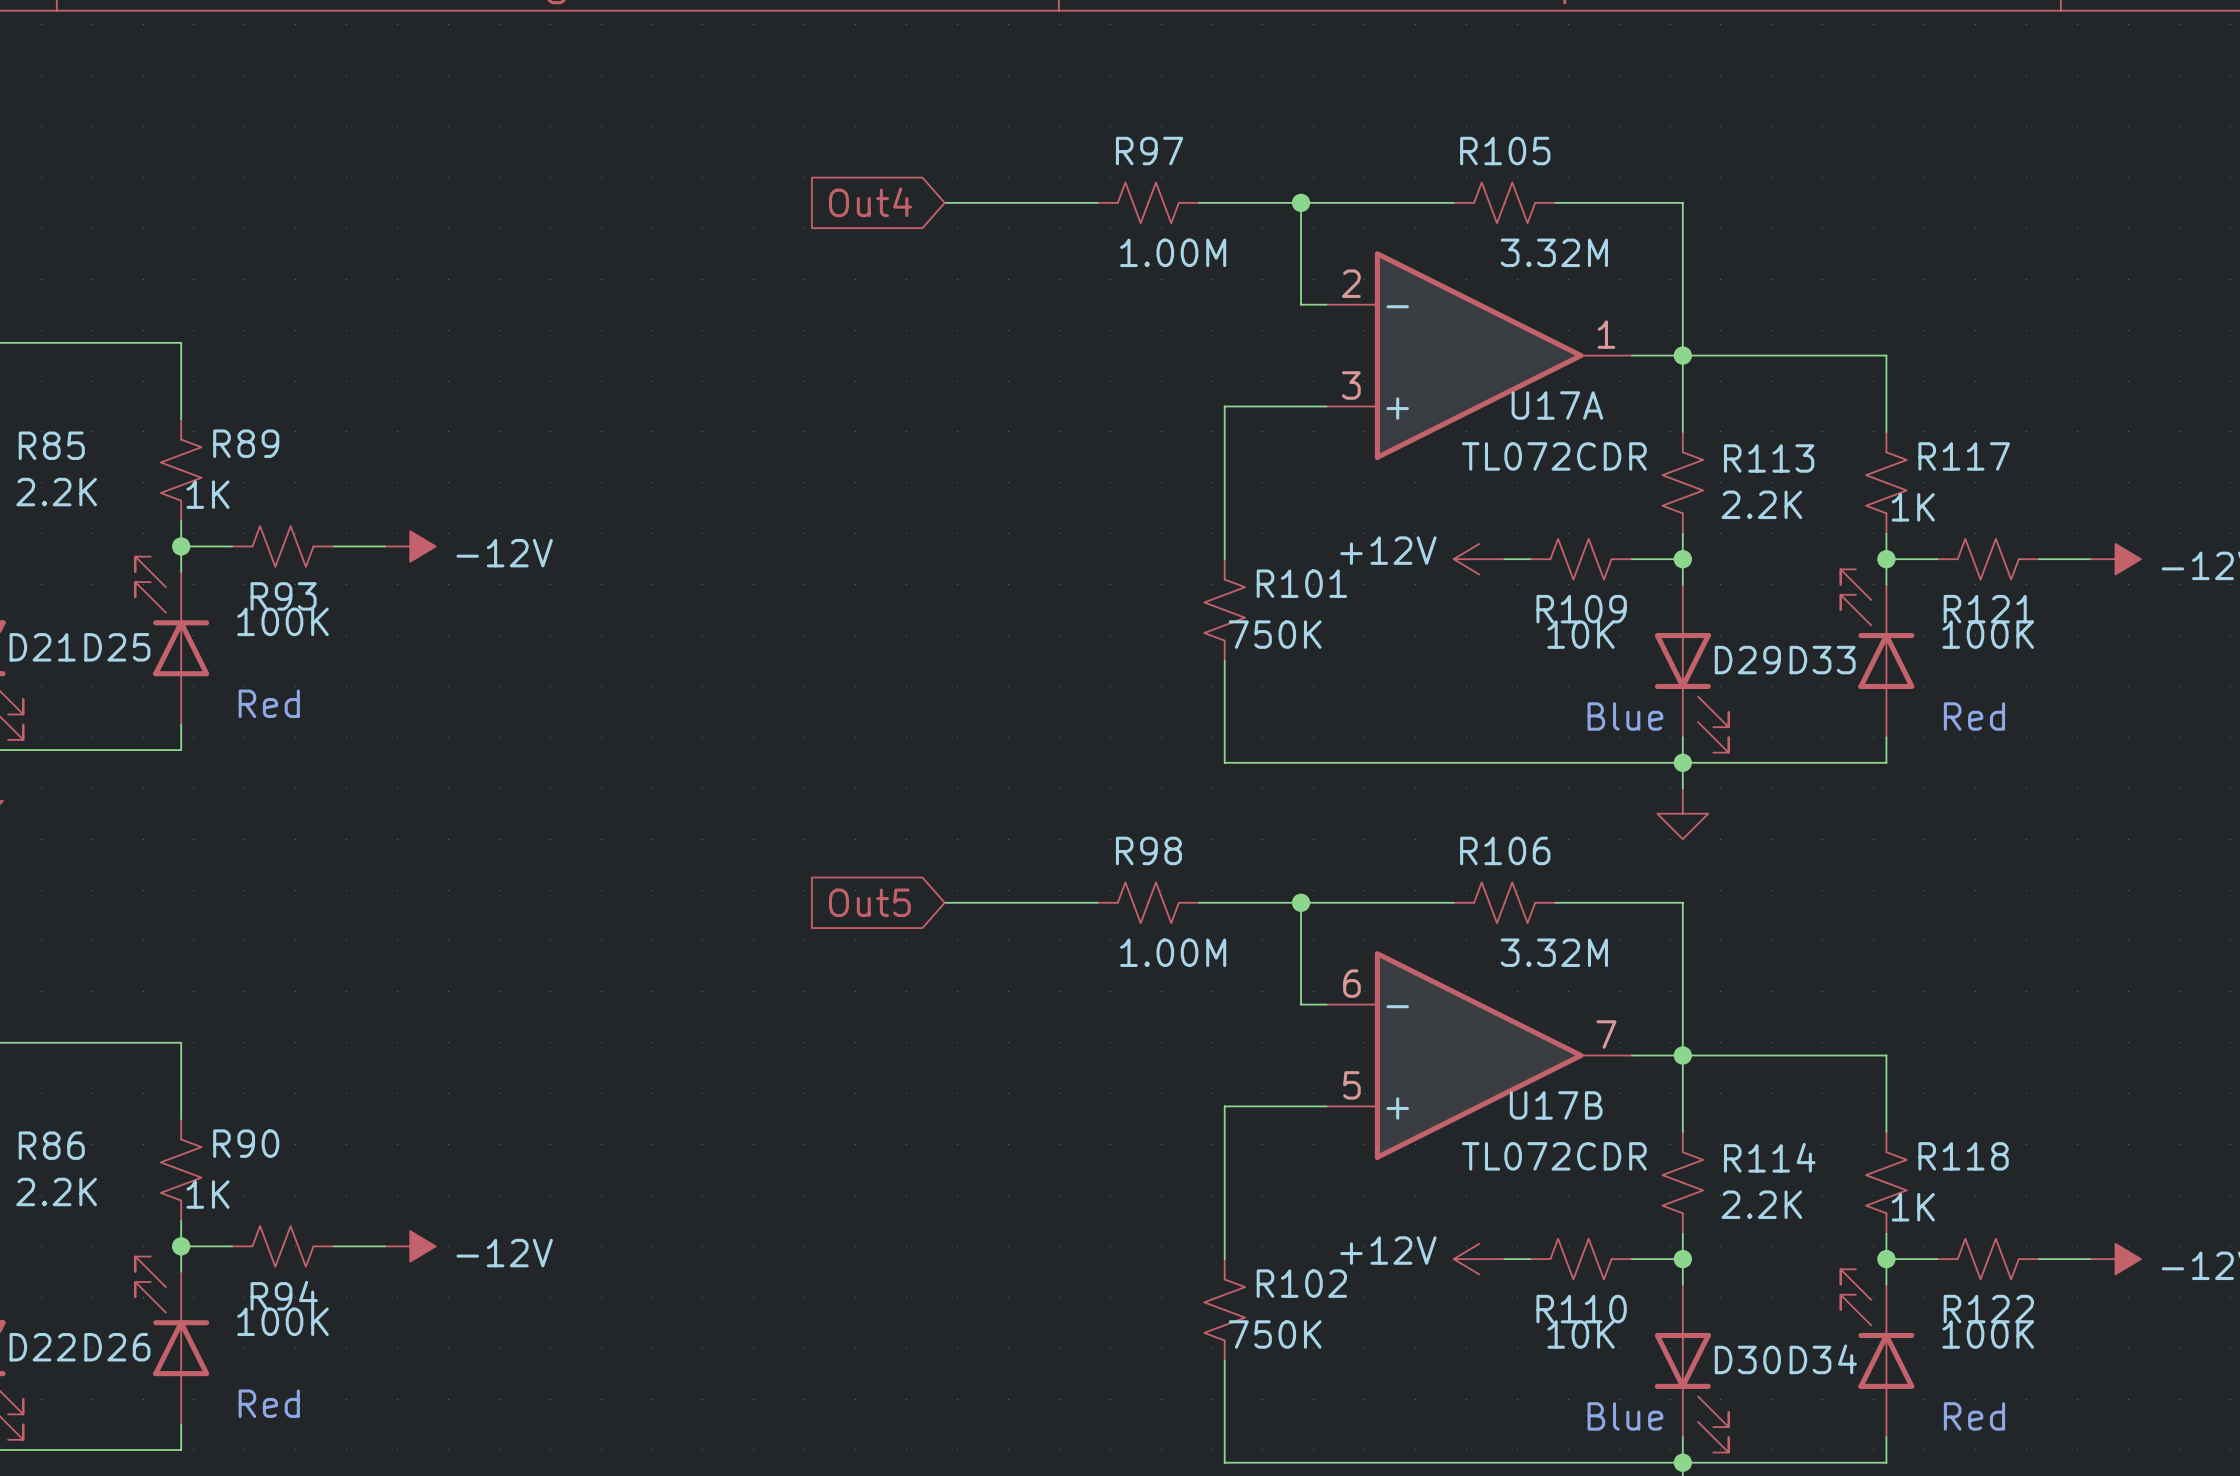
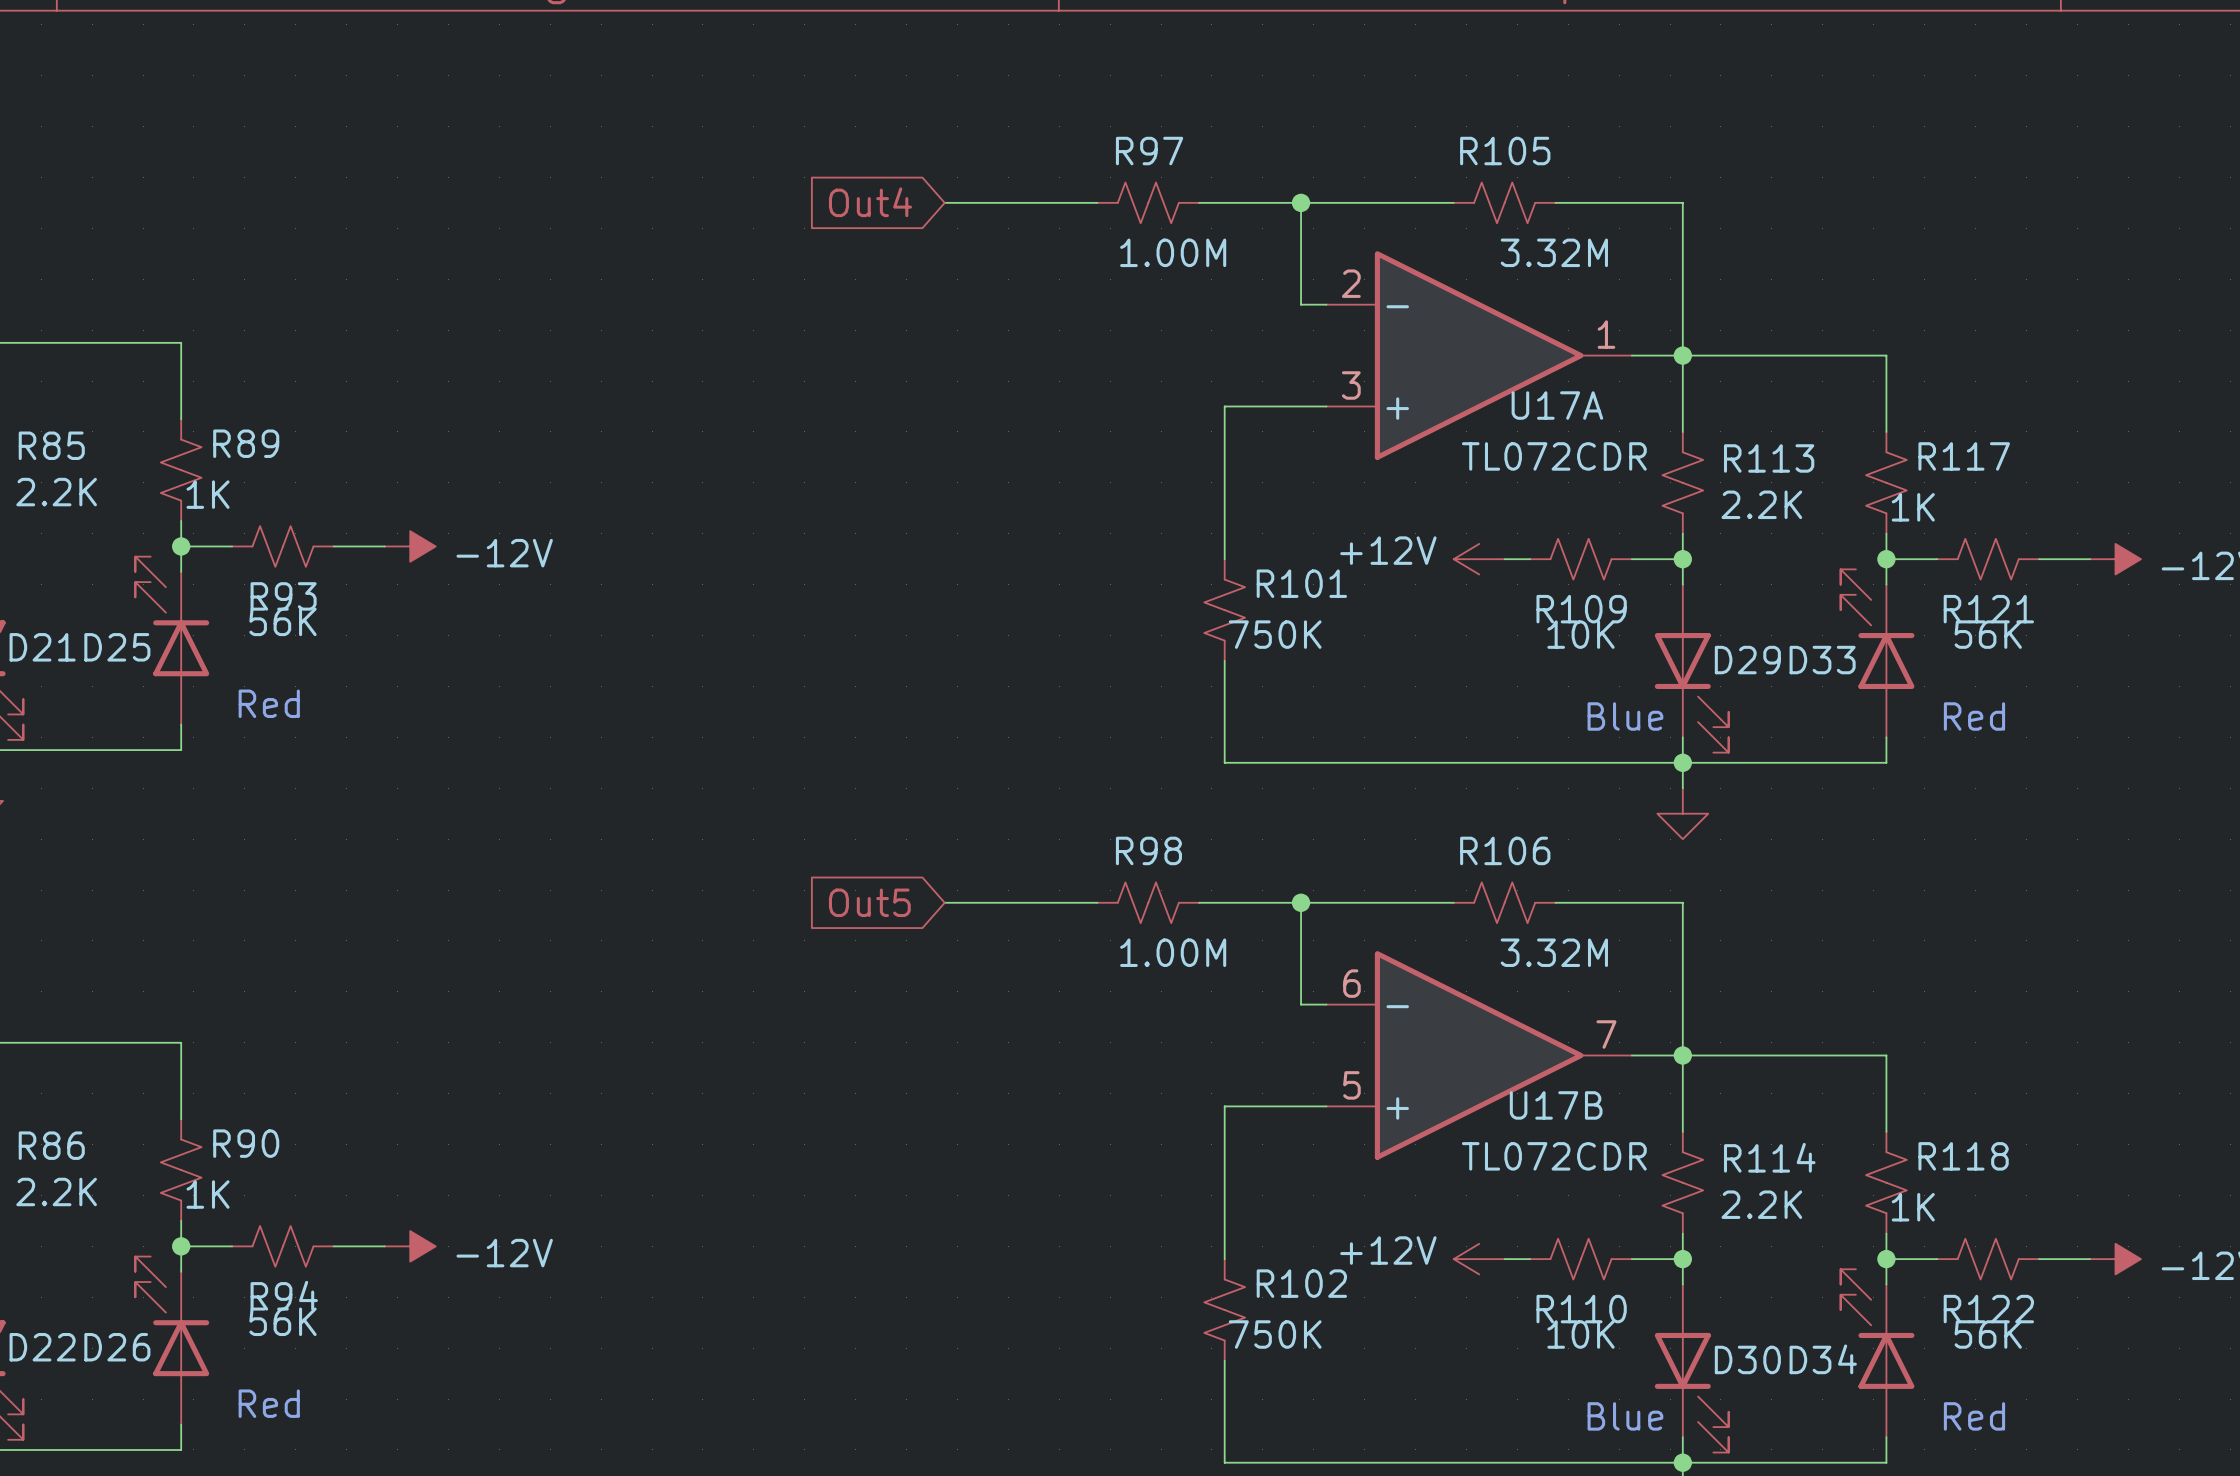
R93 value: 100K (282, 621) -> 56K (282, 621)
R121 value: 100K (1988, 634) -> 56K (1988, 634)
R94 value: 100K (282, 1321) -> 56K (282, 1321)
R122 value: 100K (1988, 1334) -> 56K (1988, 1334)

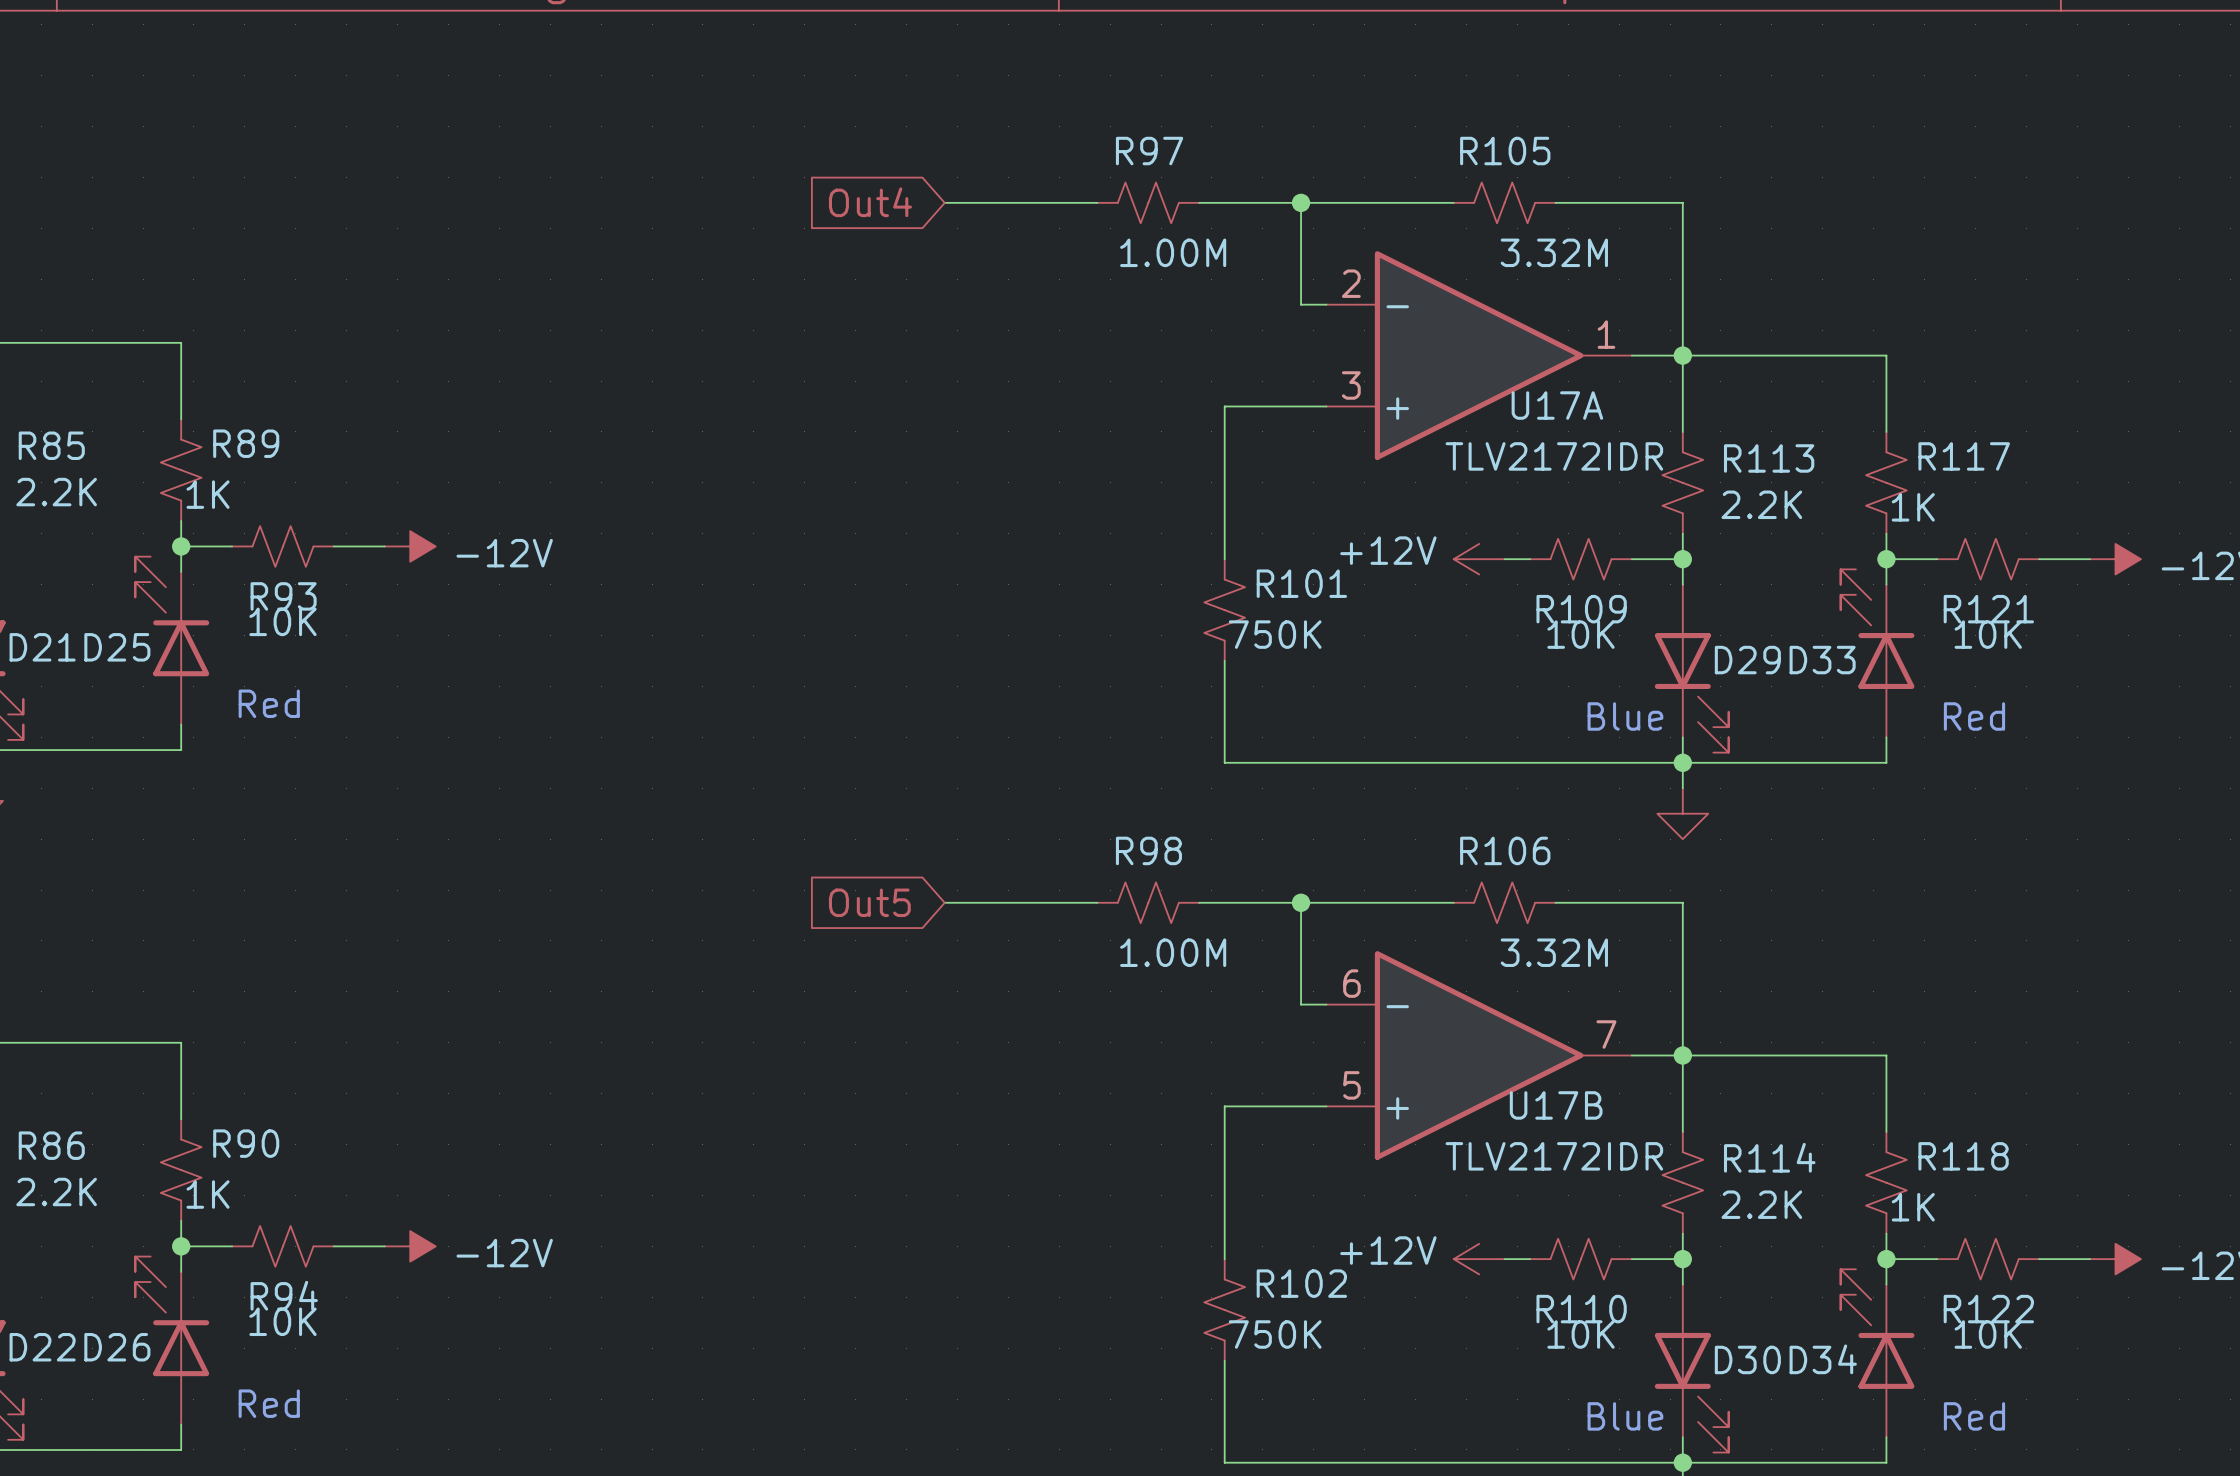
U17A value: TL072CDR (1554, 456) -> TLV2172IDR (1554, 456)
R93 value: 56K (282, 621) -> 10K (282, 621)
R121 value: 56K (1988, 634) -> 10K (1988, 634)
U17B value: TL072CDR (1554, 1156) -> TLV2172IDR (1554, 1156)
R94 value: 56K (282, 1321) -> 10K (282, 1321)
R122 value: 56K (1988, 1334) -> 10K (1988, 1334)

